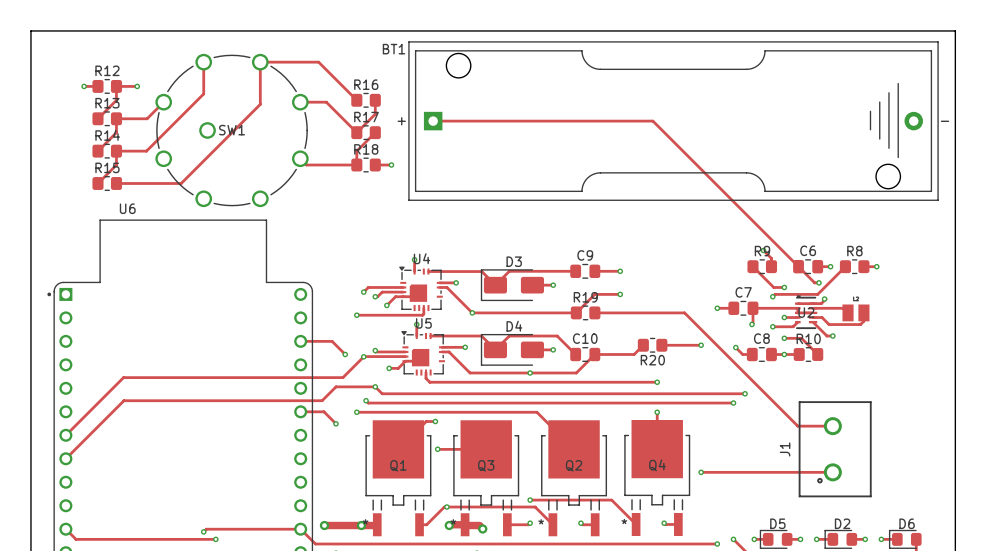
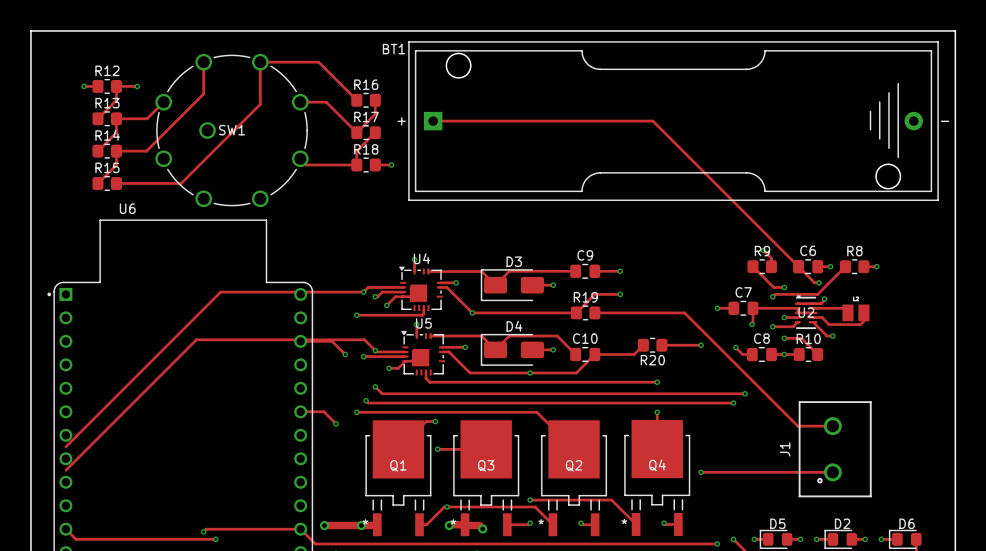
track: none -> (363, 292) (220, 292) (65, 446)
track: none -> (375, 350) (364, 339) (196, 339) (65, 470)
track: (363, 356) (342, 377) (123, 377) (65, 435) -> none
track: (375, 386) (336, 386) (322, 400) (123, 400) (65, 458) -> none

